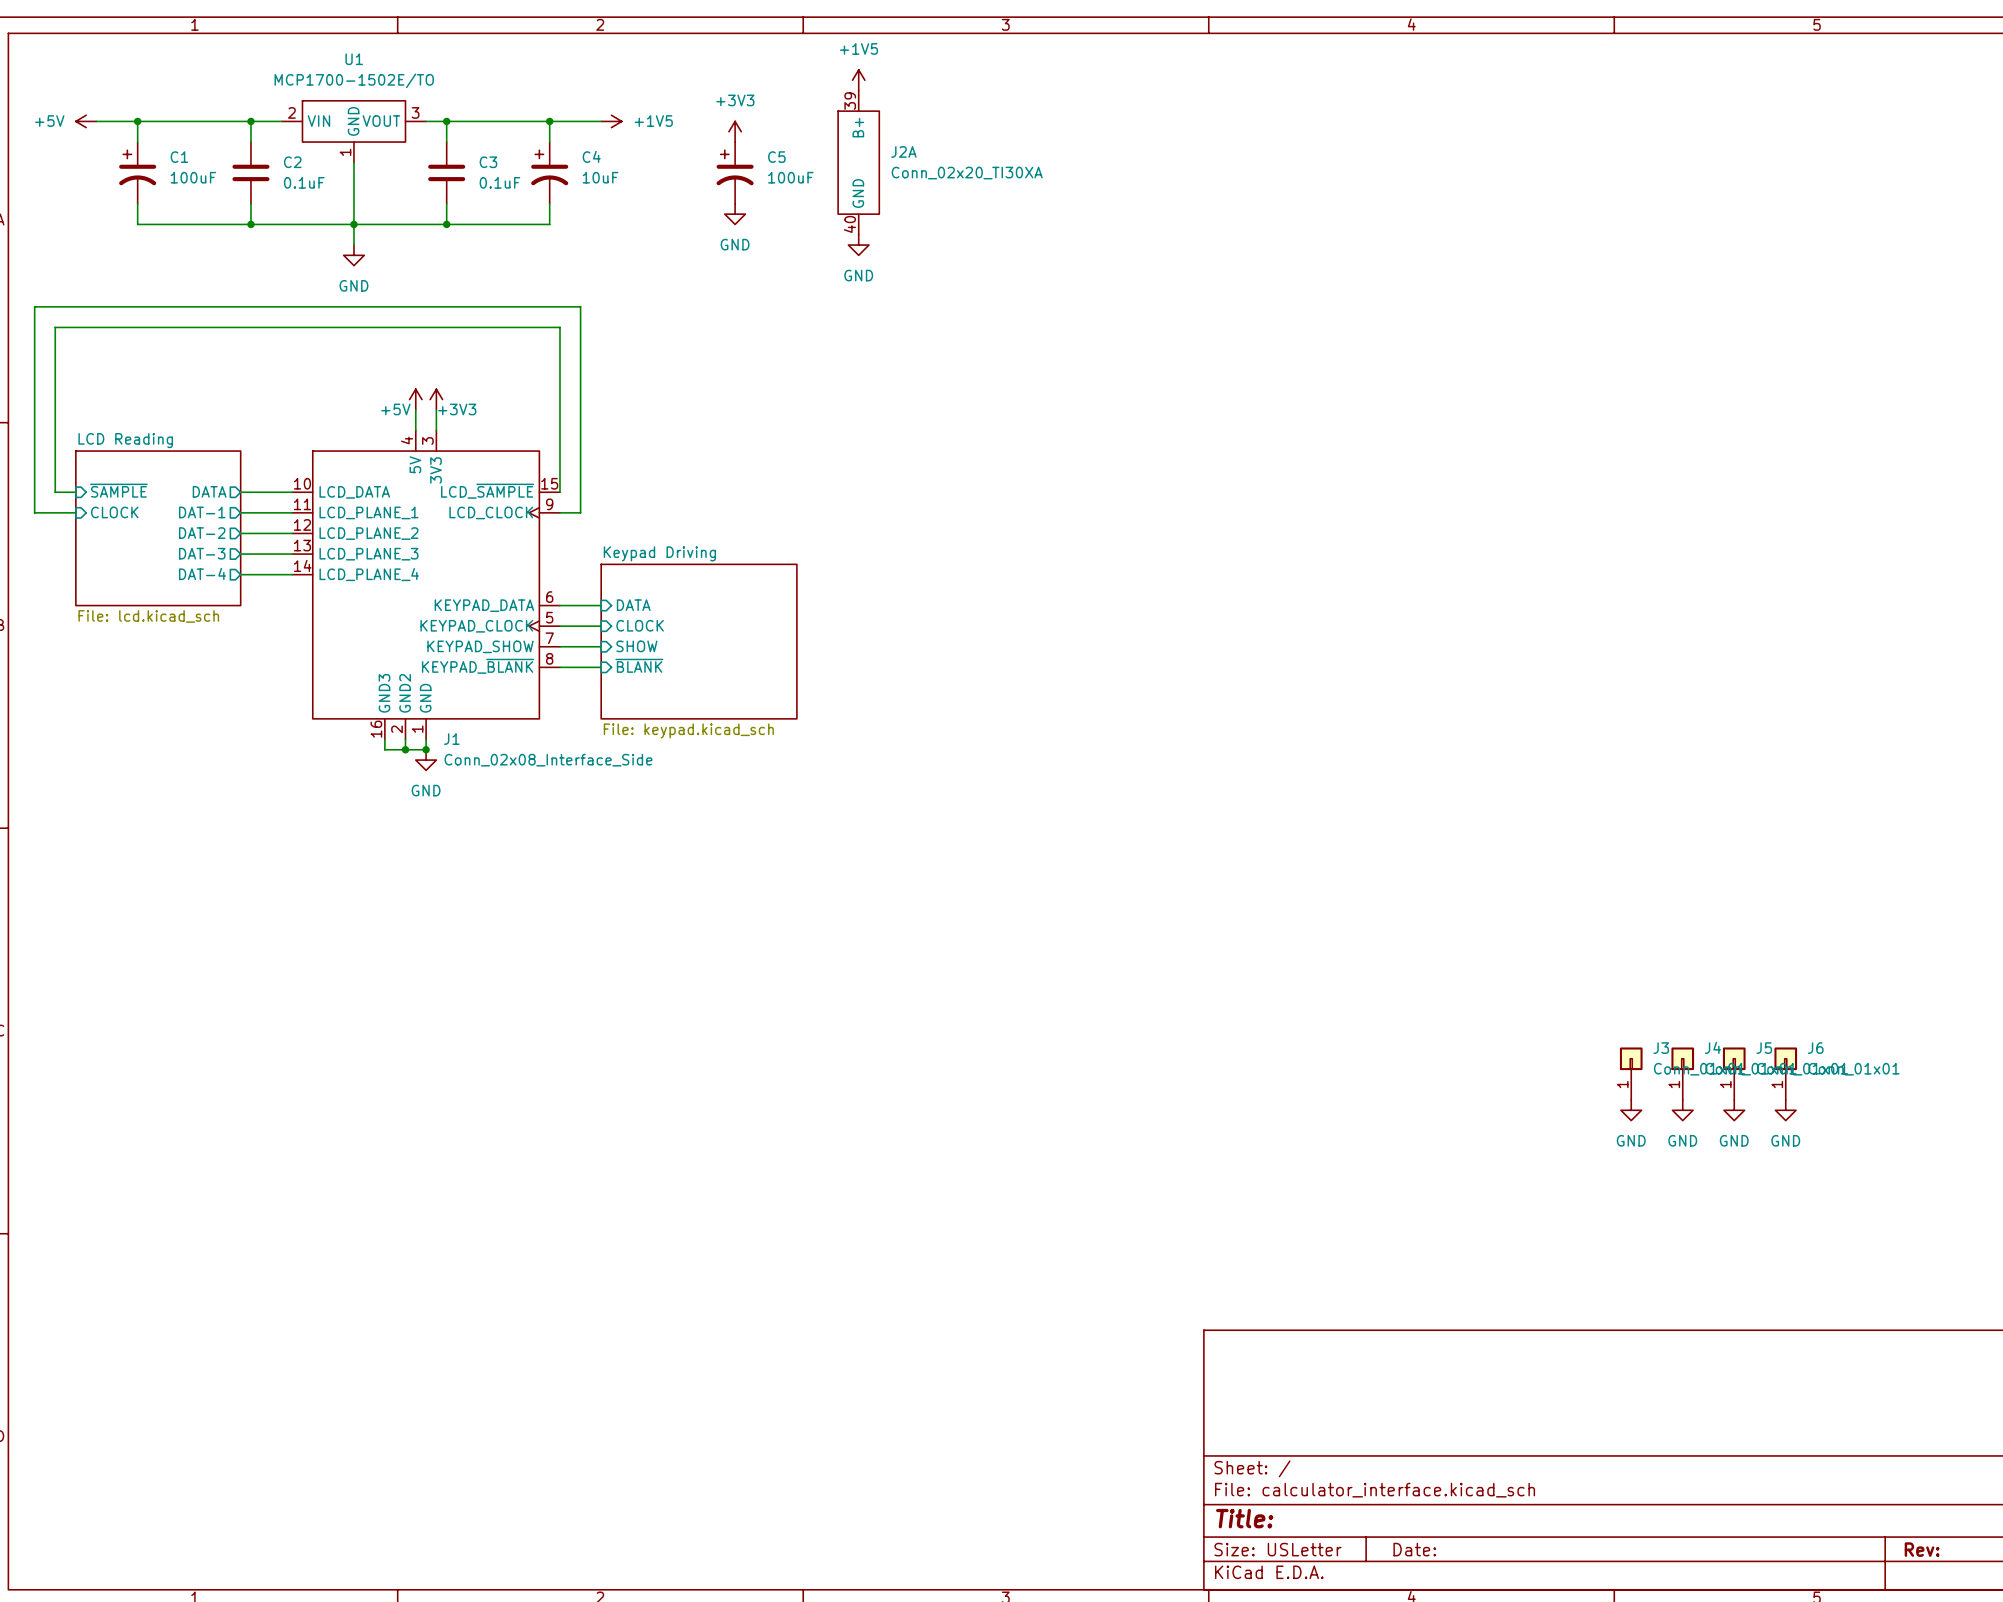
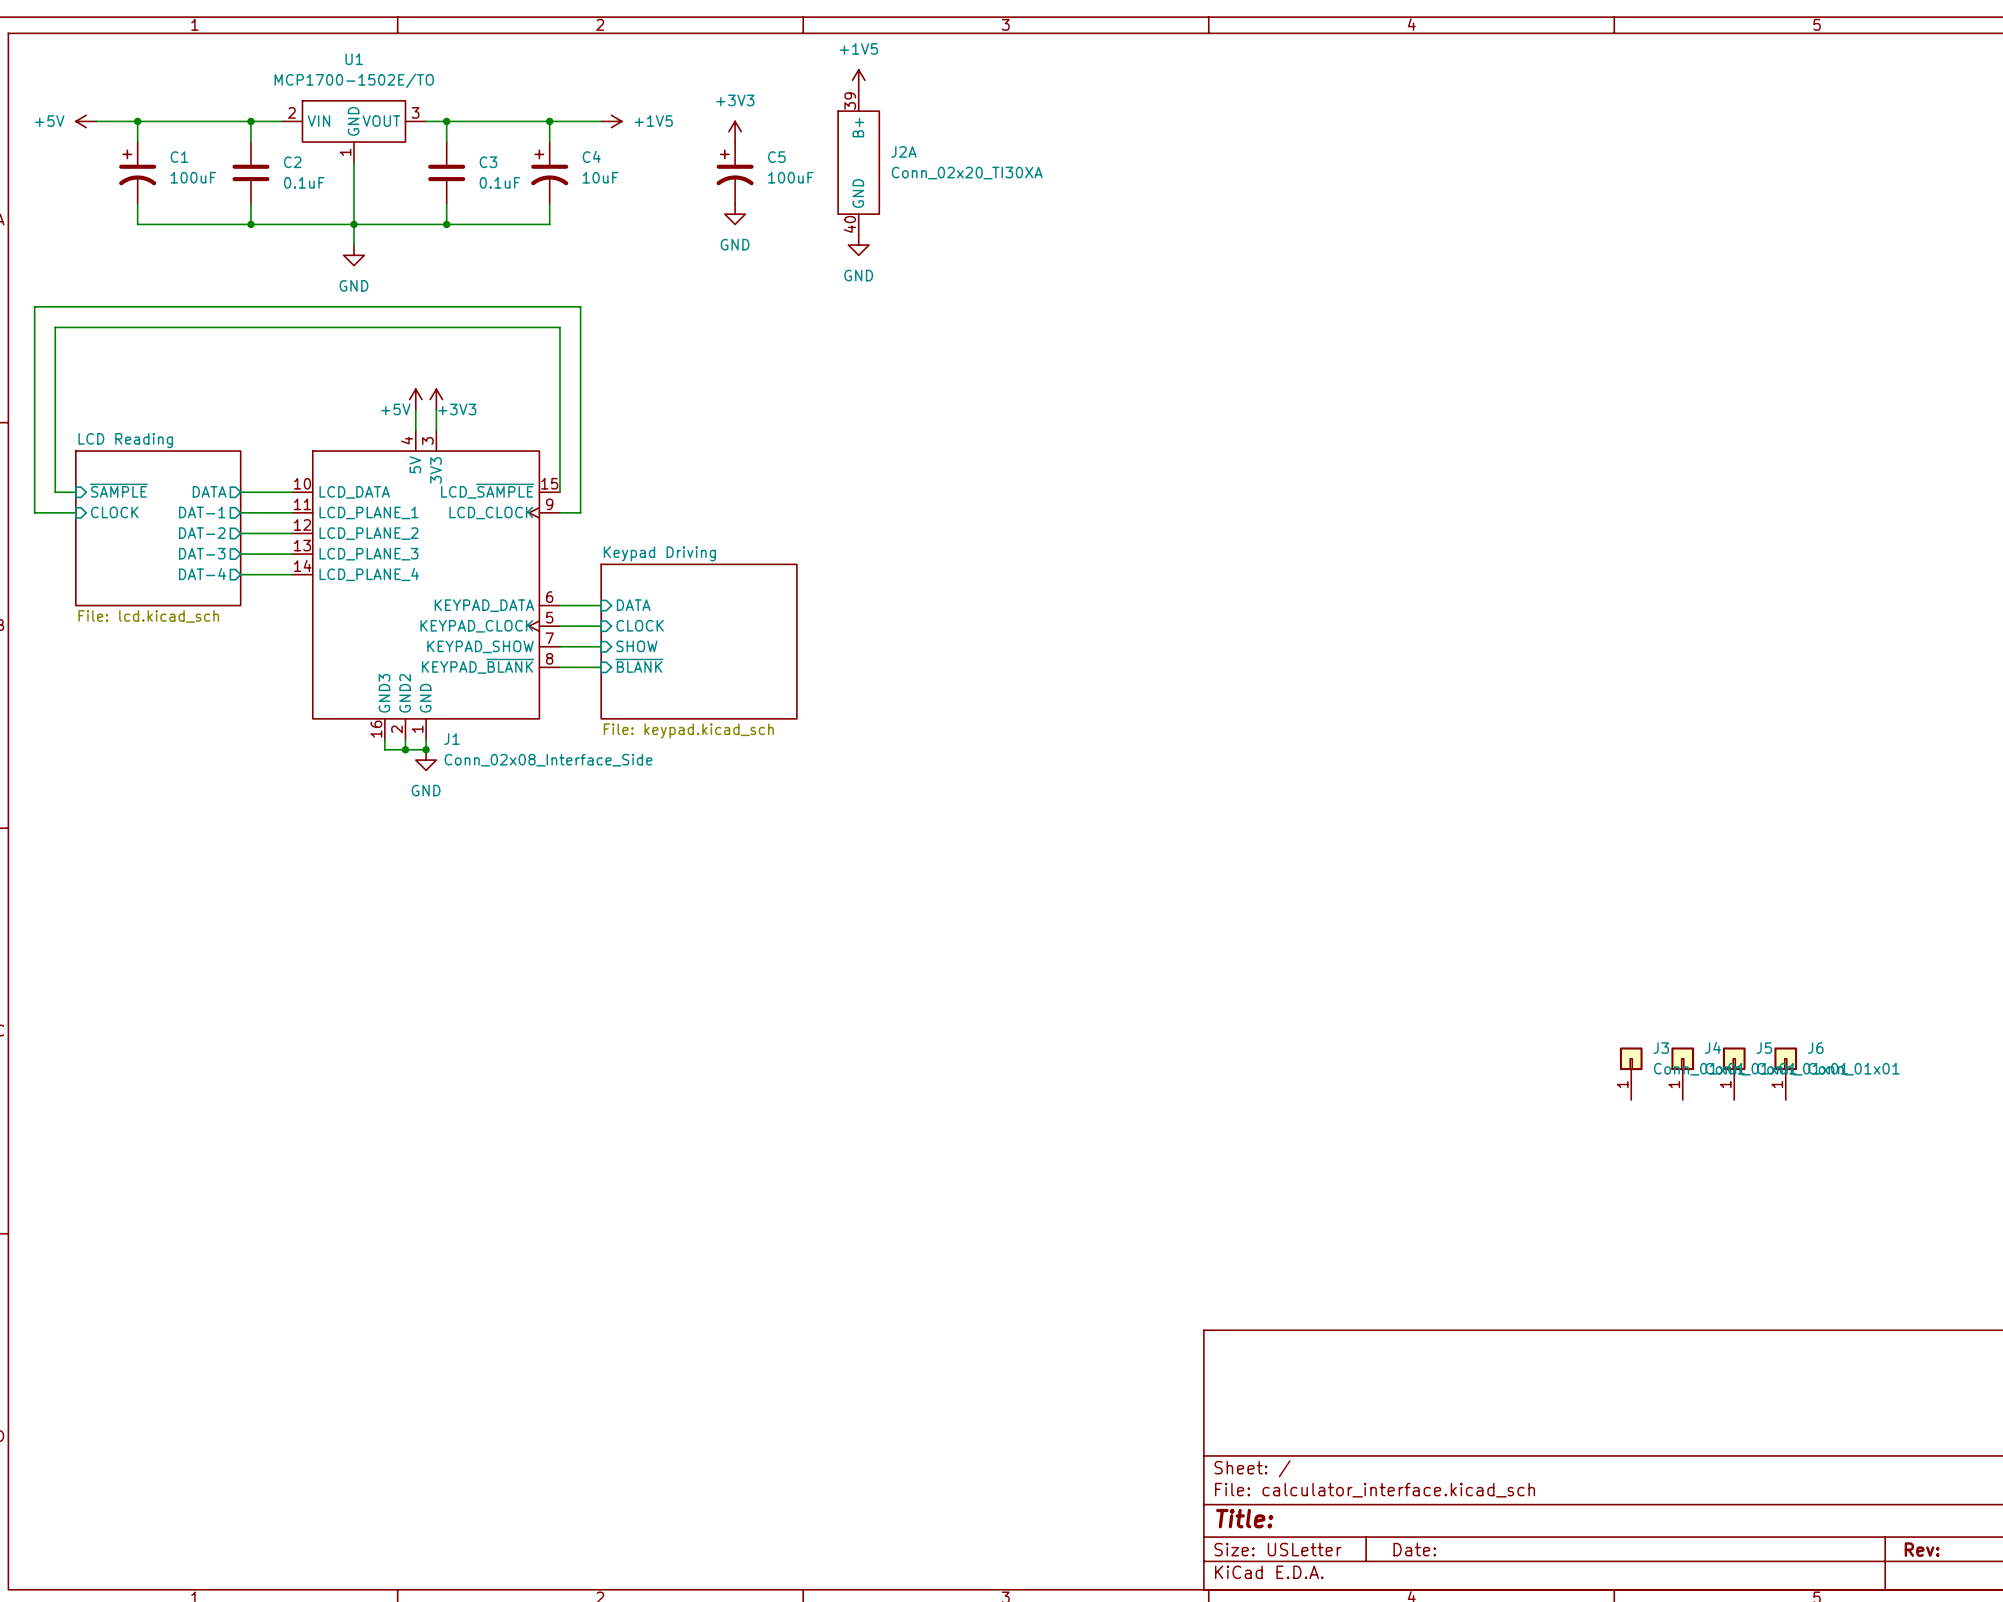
power symbol: GND (1631, 1110) -> none
power symbol: GND (1682, 1110) -> none
power symbol: GND (1734, 1110) -> none
power symbol: GND (1785, 1110) -> none

